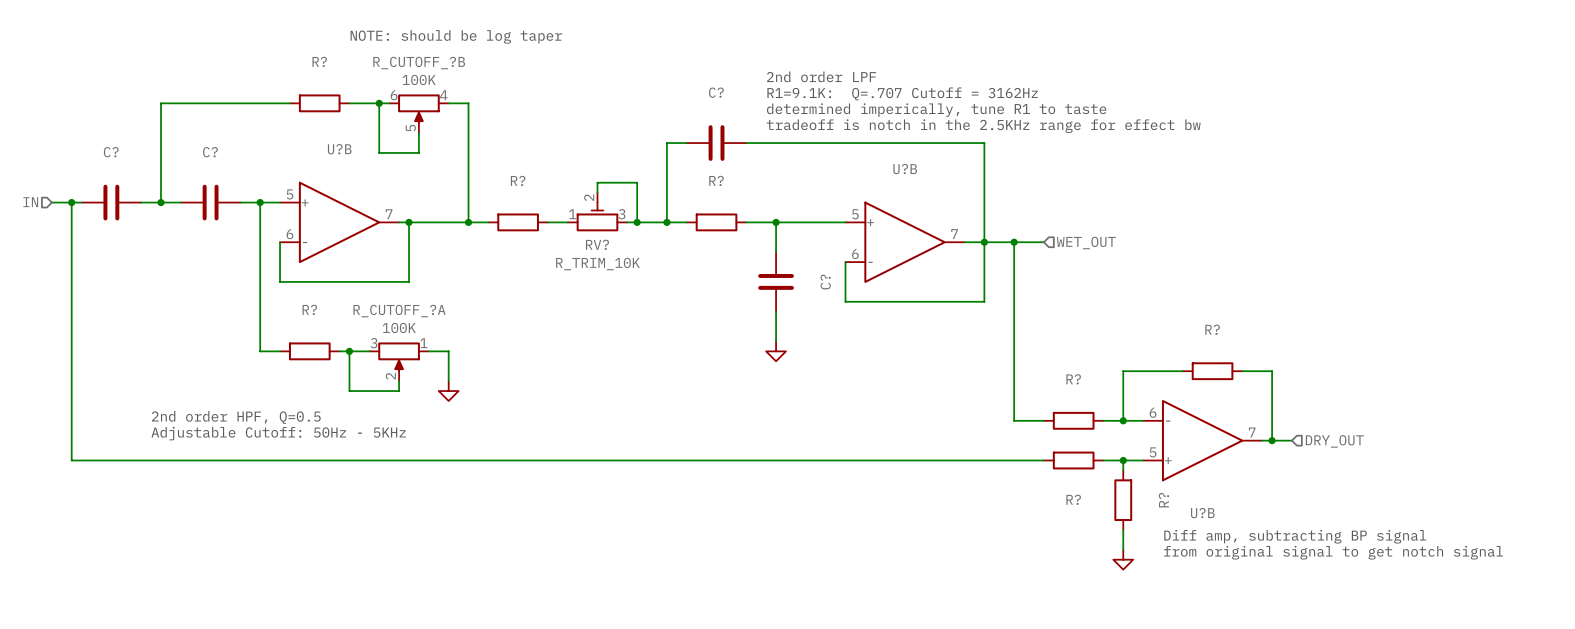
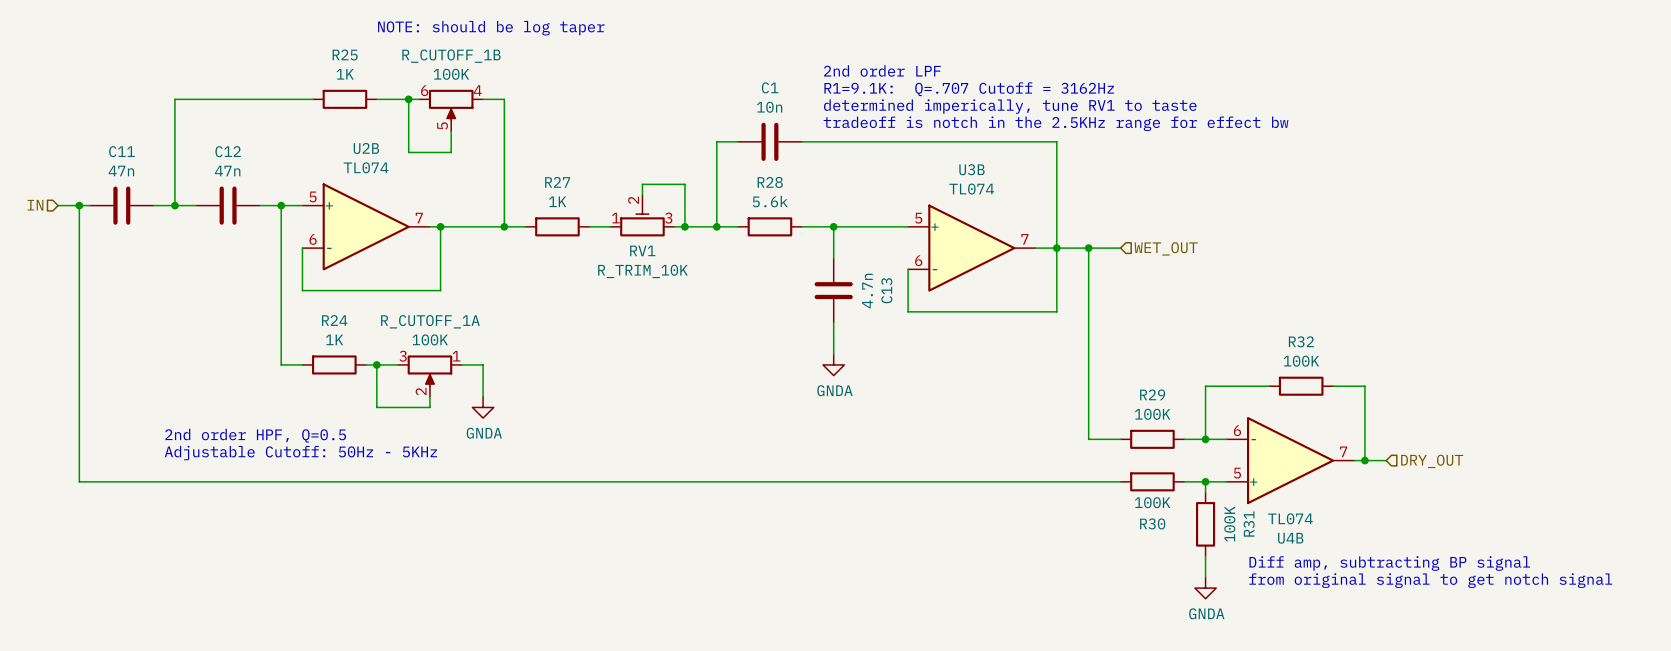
R? name: R? (319, 61) -> R25 (345, 54)
R_CUTOFF_?B name: R_CUTOFF_?B (419, 63) -> R_CUTOFF_1B (451, 56)
R? value: none -> 1K (345, 74)
C? name: C? (716, 92) -> C1 (770, 87)
C? value: none -> 10n (769, 107)
text: determined imperically, tune R1 to taste (936, 110) -> determined imperically, tune RV1 to taste (1010, 106)
U?B name: U?B (339, 149) -> U2B (366, 148)
C? name: C? (111, 152) -> C11 (122, 151)
C? name: C? (210, 152) -> C12 (228, 151)
U?B value: none -> TL074 (366, 167)
U?B name: U?B (905, 169) -> U3B (971, 169)
C? value: none -> 47n (121, 170)
C? value: none -> 47n (227, 170)
R? name: R? (518, 180) -> R27 (557, 182)
R? name: R? (716, 180) -> R28 (770, 182)
U?B value: none -> TL074 (971, 189)
R? value: none -> 5.6k (770, 201)
R? value: none -> 1K (557, 201)
RV? name: RV? (597, 244) -> RV1 (642, 250)
C? value: none -> 4.7n (867, 291)
C? name: C? (825, 282) -> C13 (886, 290)
R? name: R? (309, 309) -> R24 (334, 320)
R_CUTOFF_?A name: R_CUTOFF_?A (399, 311) -> R_CUTOFF_1A (430, 321)
R? value: none -> 1K (334, 339)
R? name: R? (1212, 329) -> R32 (1301, 341)
R? value: none -> 100K (1301, 361)
power symbol text: none -> GNDA (834, 390)
R? name: R? (1073, 379) -> R29 (1152, 394)
R? value: none -> 100K (1152, 414)
power symbol text: none -> GNDA (484, 433)
R? value: none -> 100K (1152, 502)
U?B value: none -> TL074 (1290, 518)
R? name: R? (1073, 499) -> R30 (1152, 523)
R? value: none -> 100K (1229, 524)
R? name: R? (1163, 500) -> R31 (1249, 524)
U?B name: U?B (1202, 513) -> U4B (1290, 538)
power symbol text: none -> GNDA (1206, 613)

